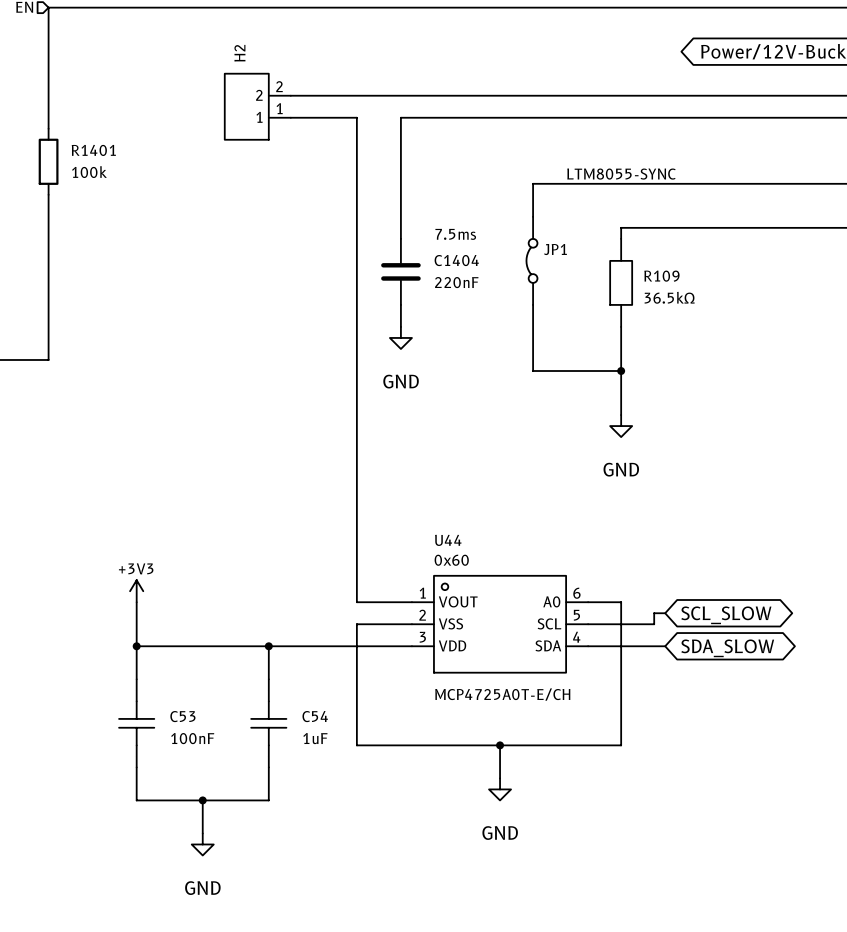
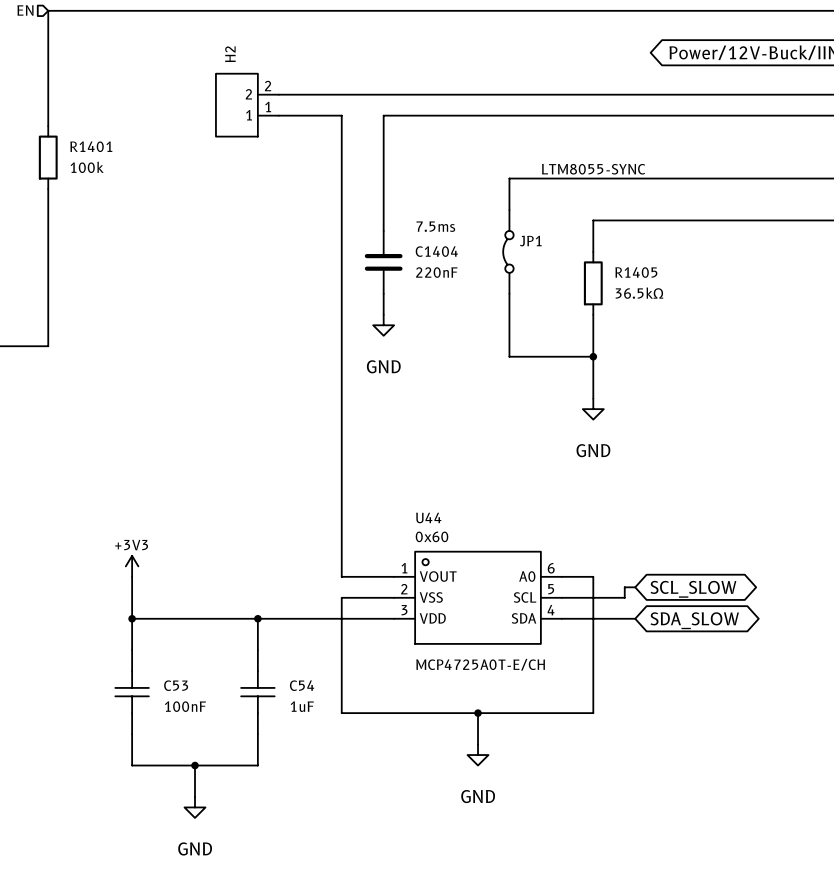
R109: 36.5kΩ (621, 282) -> none
R1405: none -> 36.5kΩ (593, 283)

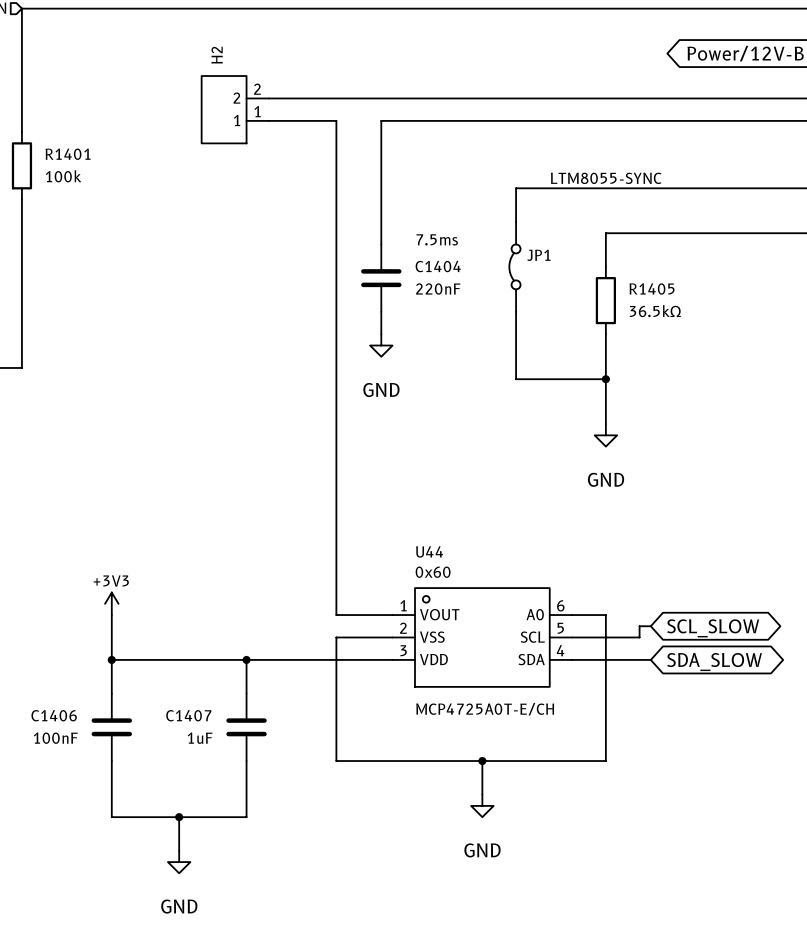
C1406: none -> 100nF (111, 727)
C1407: none -> 1uF (246, 727)
C53: 100nF (132, 692) -> none
C54: 1uF (257, 692) -> none

